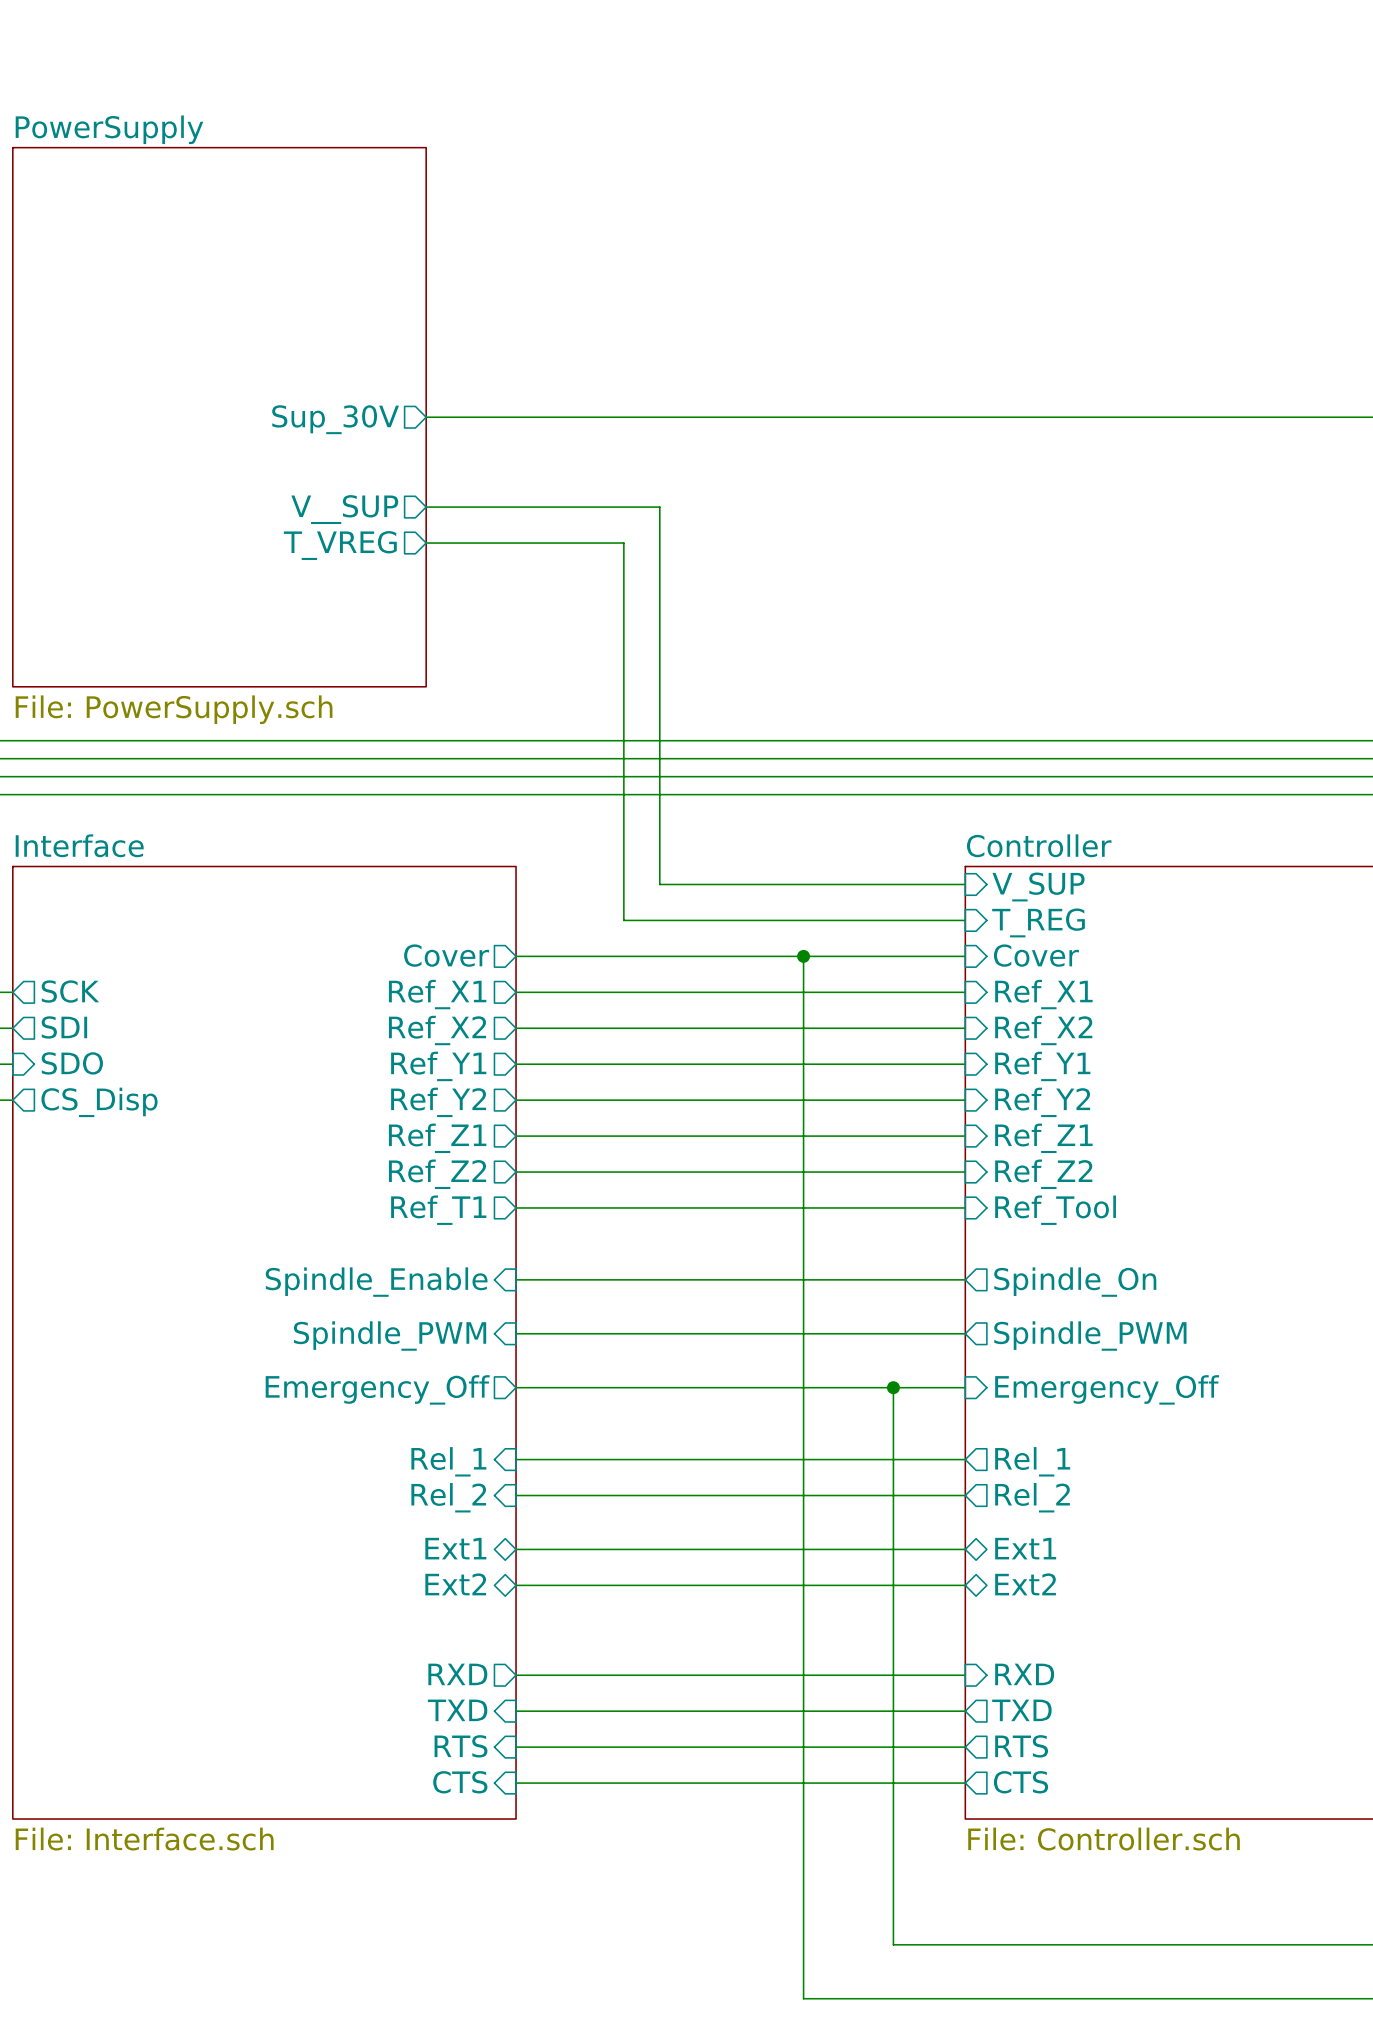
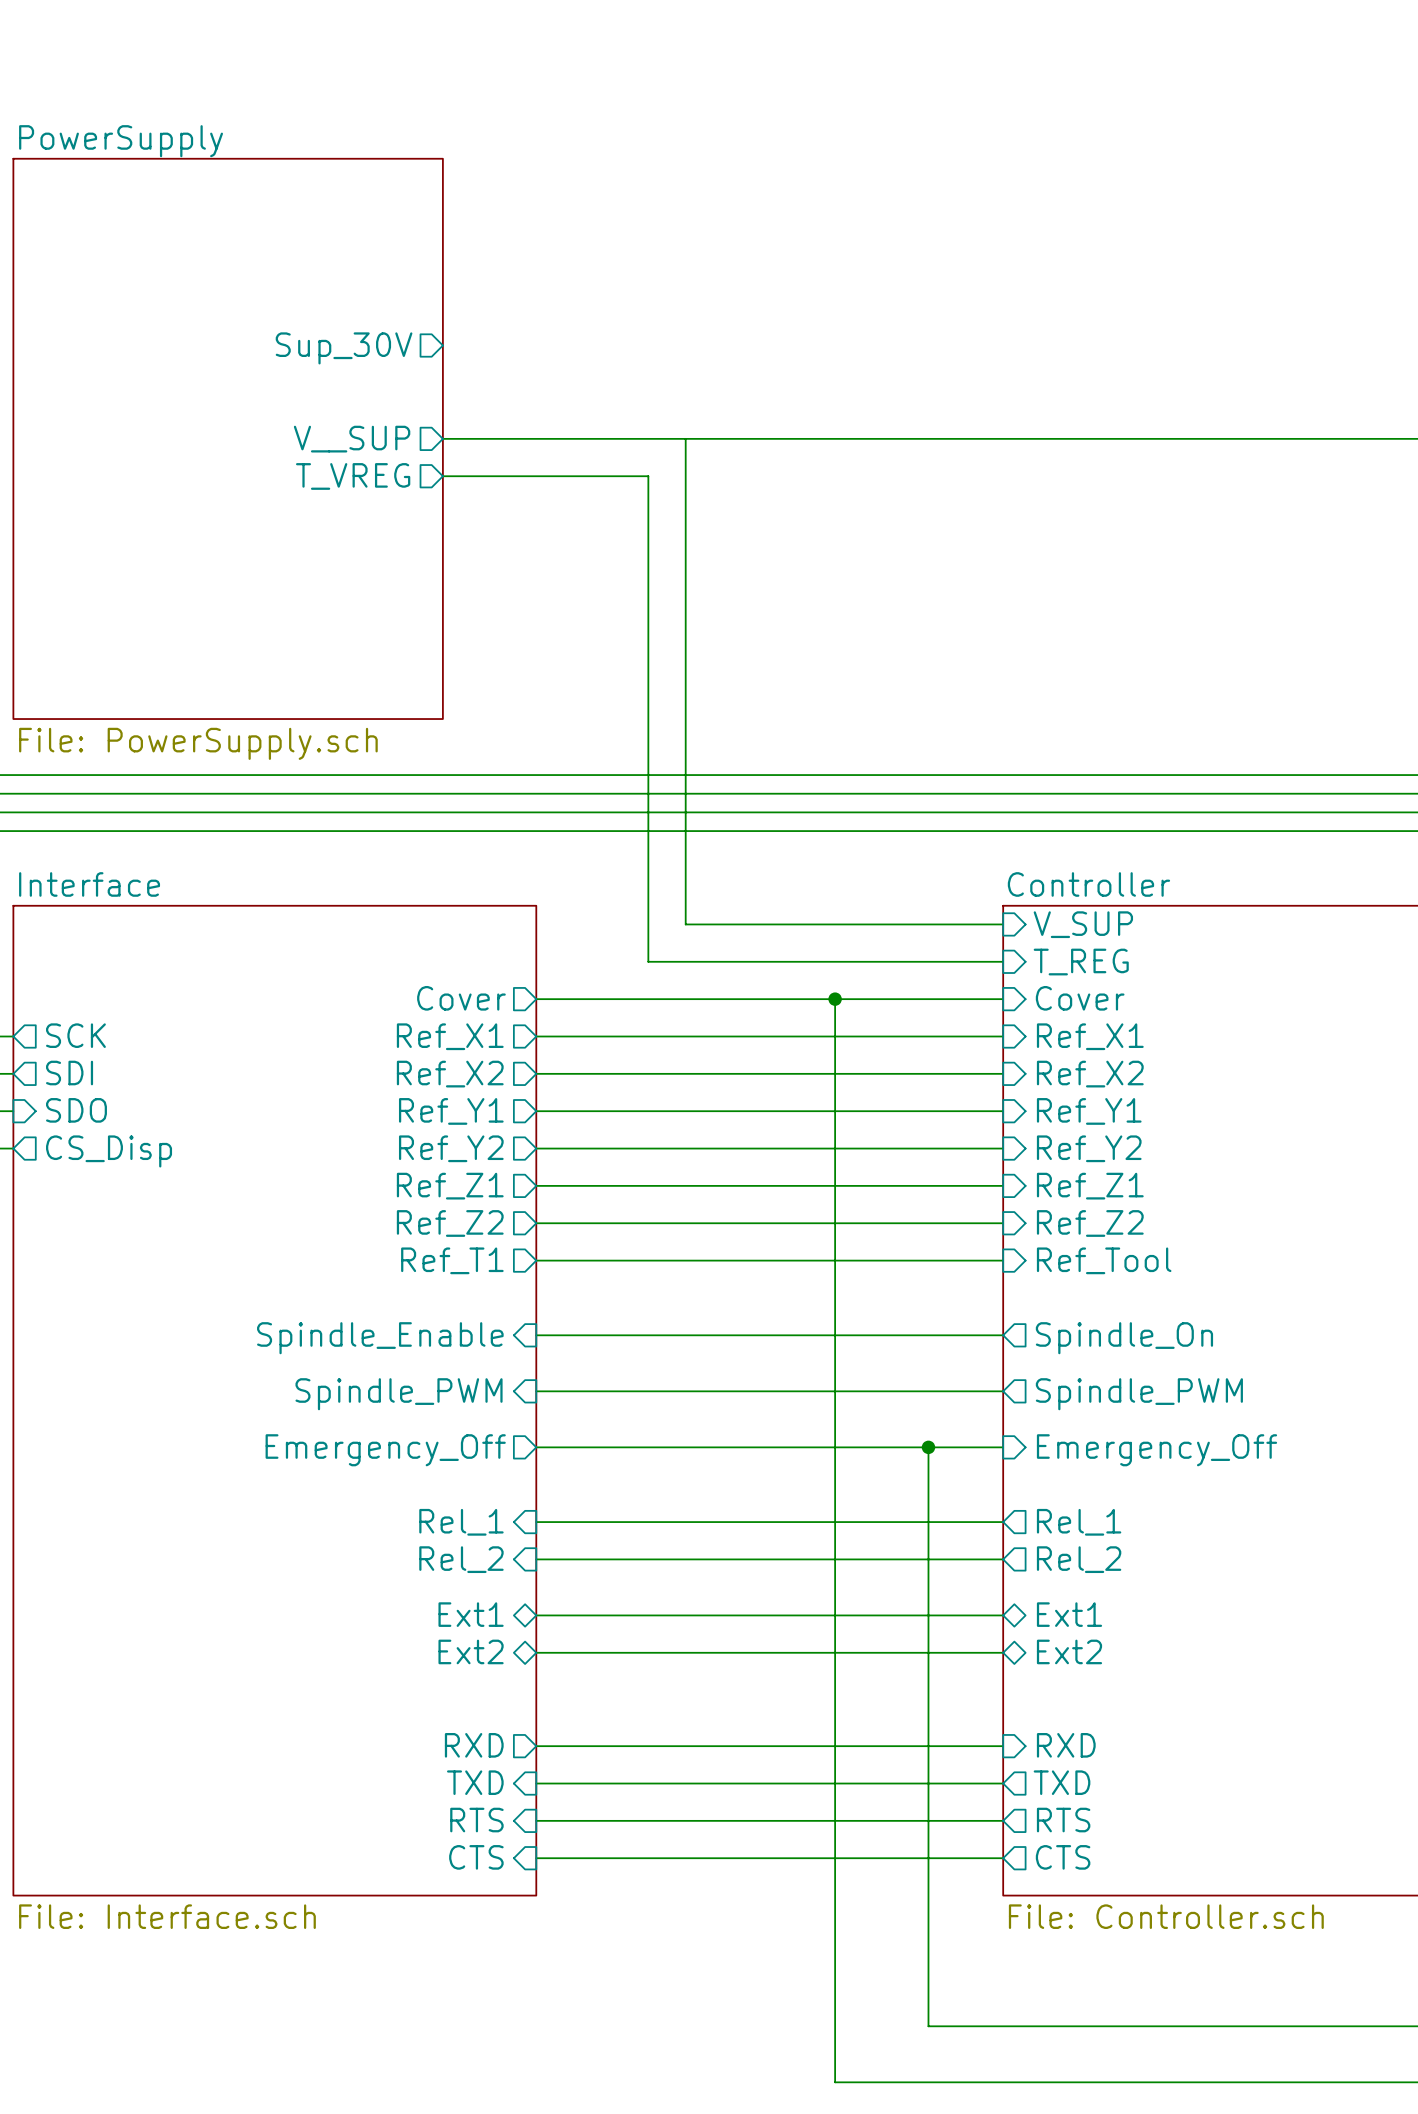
sheet pin: none -> Sup_30V (344, 348)
sheet pin: Sup_30V (335, 419) -> V__SUP (352, 439)
wire: (426, 507) (659, 507) -> (685, 438) (685, 532)
sheet pin: V__SUP (344, 509) -> none
wire: (426, 543) (623, 543) -> (442, 476) (648, 476) (648, 569)
sheet pin position: T_VREG (340, 545) -> T_VREG (353, 476)

